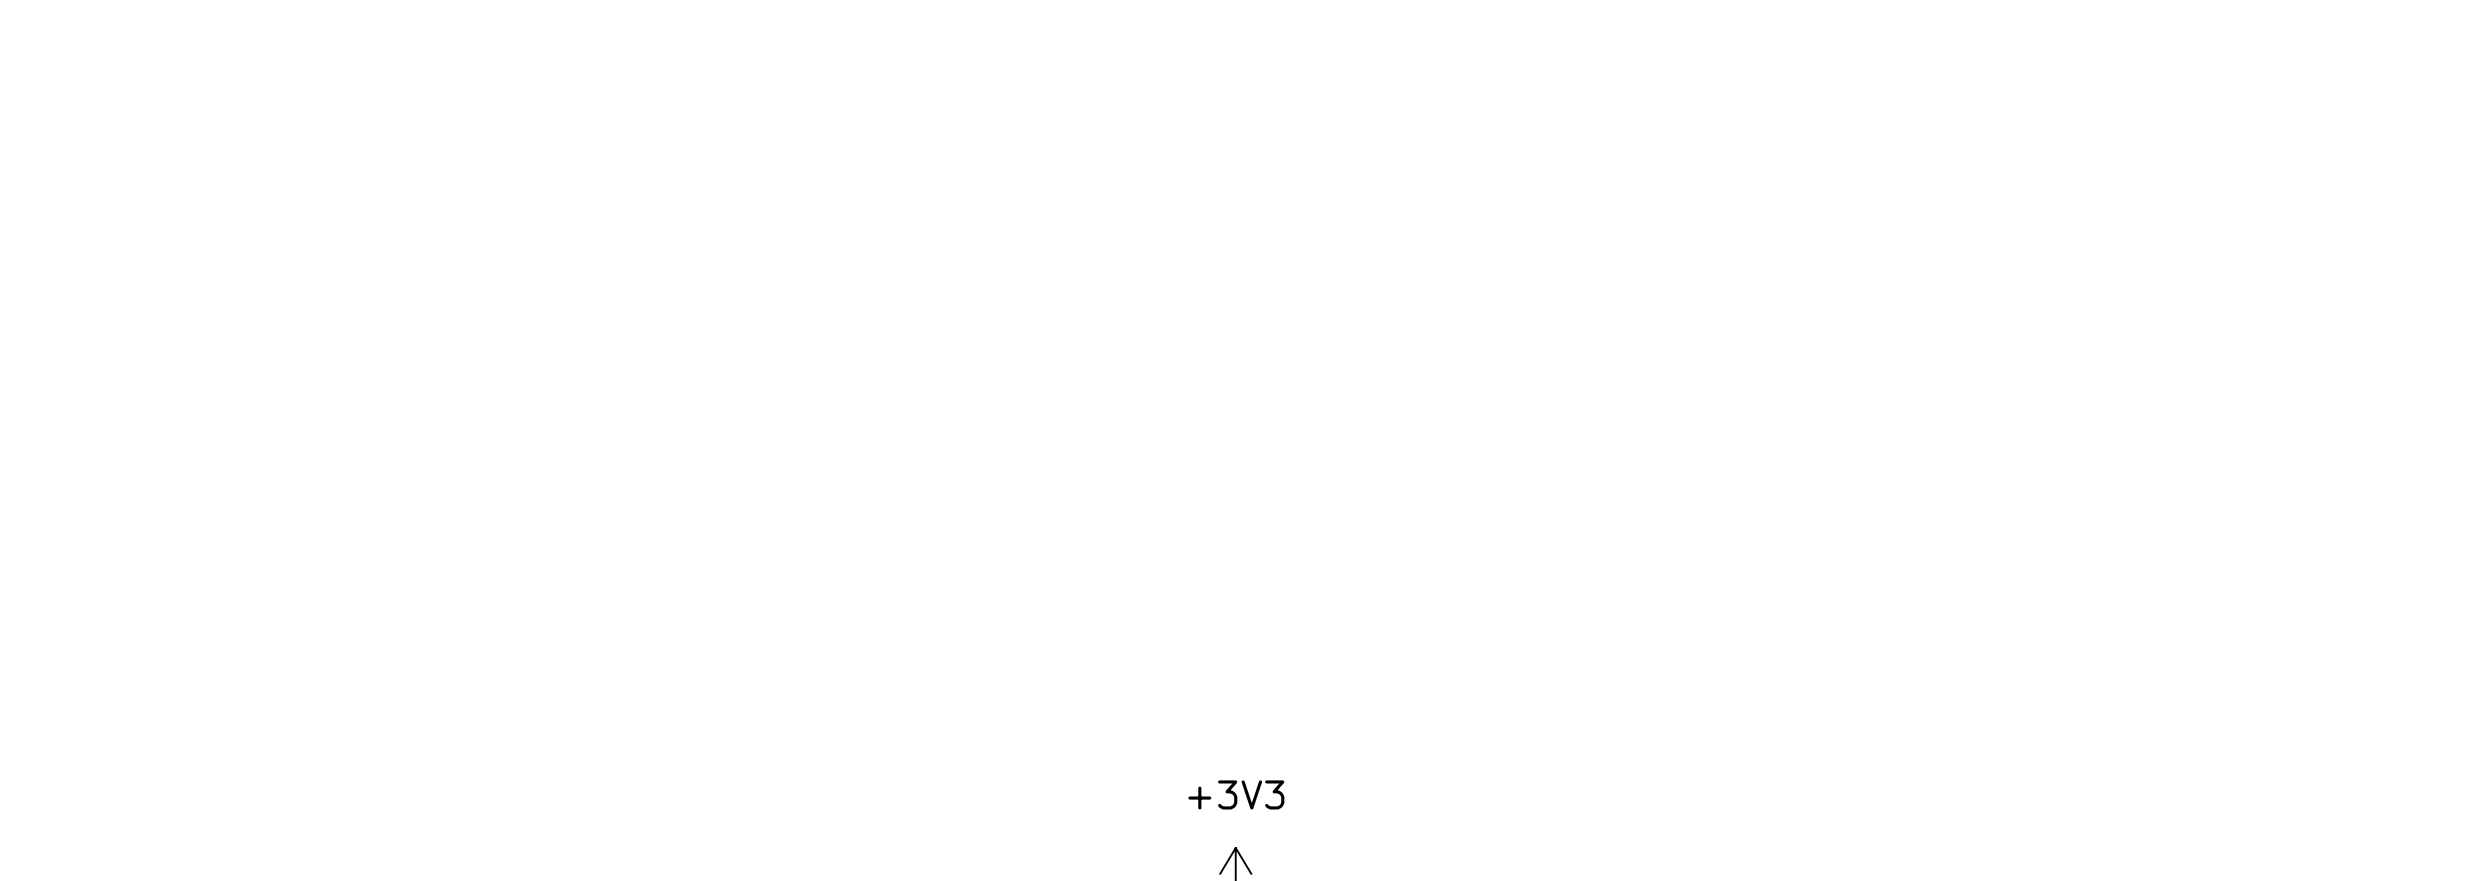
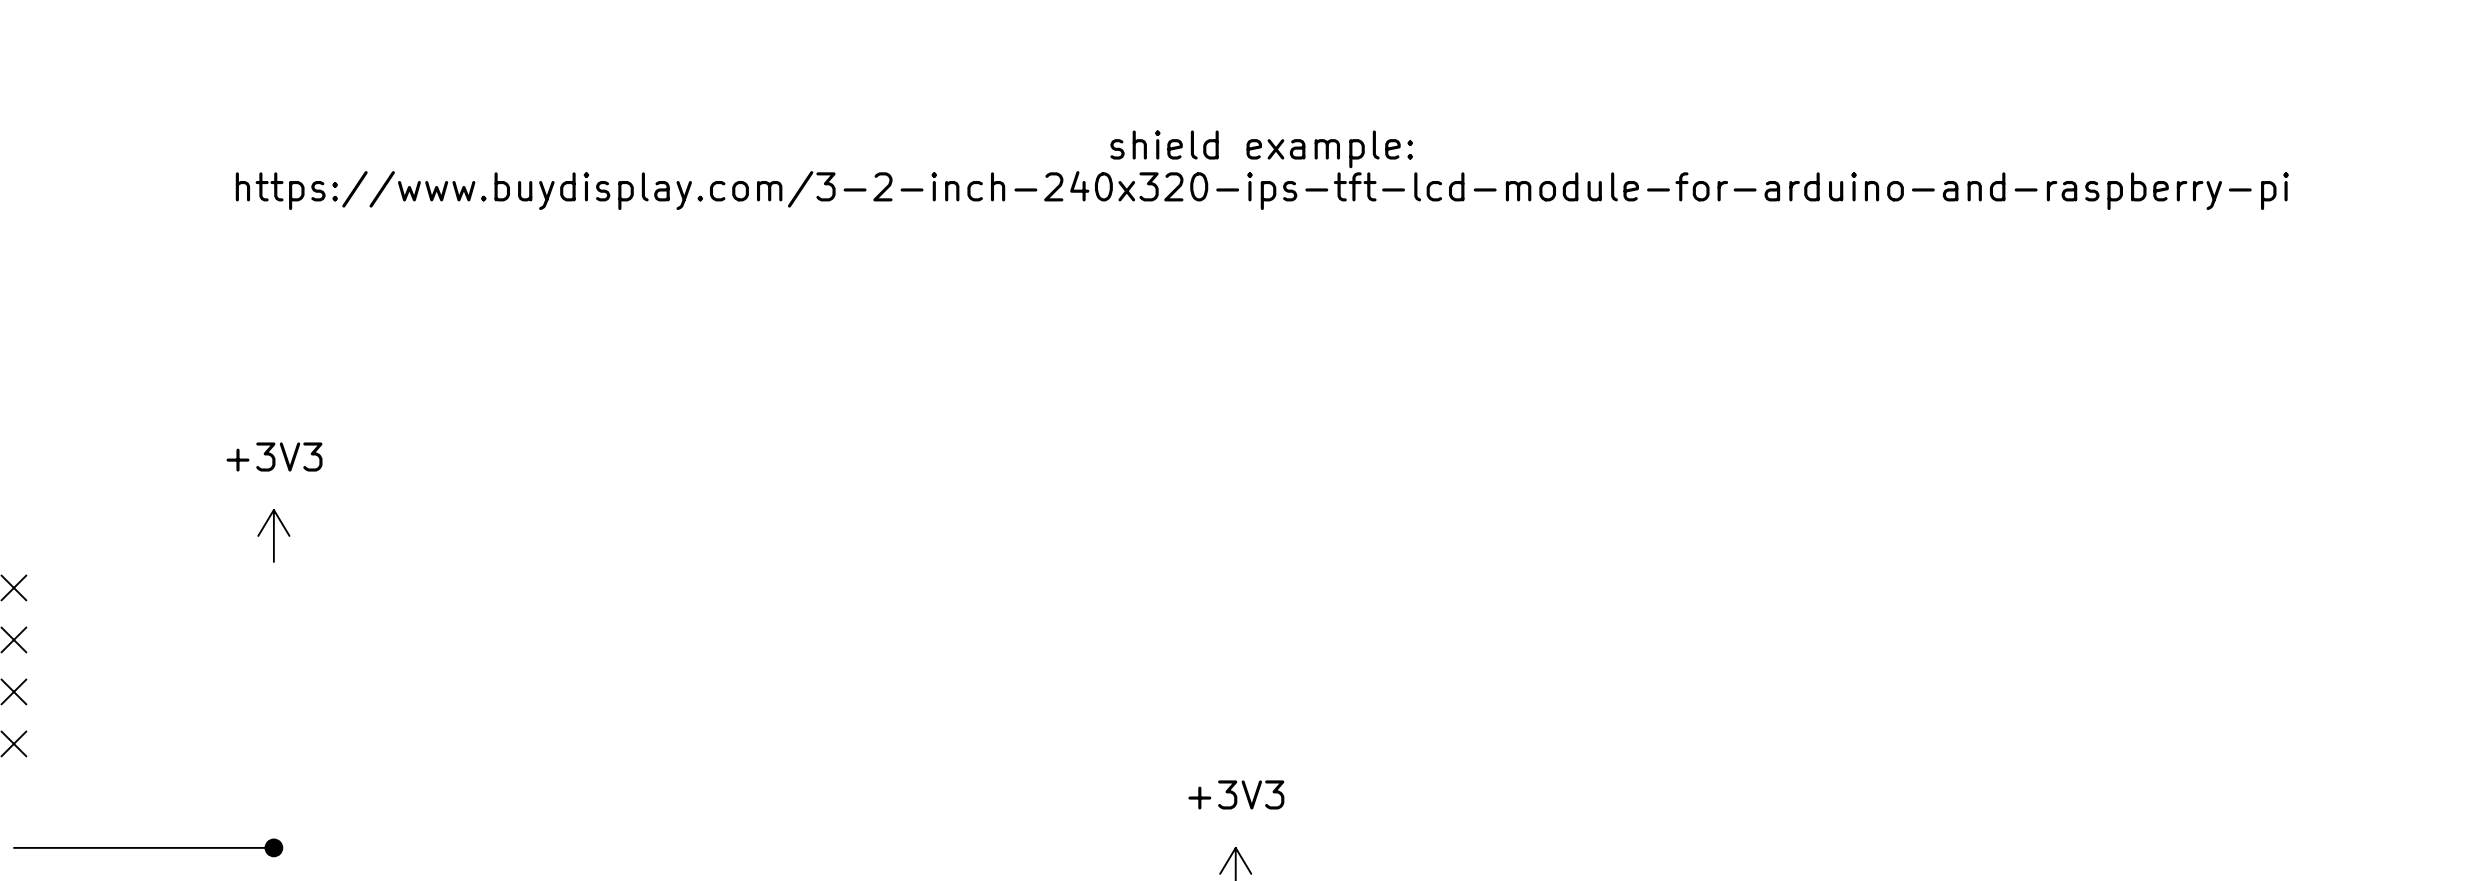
text: none -> shield example: (1261, 149)
text: none -> https://www.buydisplay.com/3-2-inch-240x320-ips-tft-lcd-module-for-arduino-and-raspberry-pi (1262, 190)
power symbol: none -> +3V3 (273, 535)
no-connect mark: none -> (13, 587)
no-connect mark: none -> (13, 639)
no-connect mark: none -> (13, 691)
no-connect mark: none -> (13, 743)
wire: none -> (13, 847) (273, 847)
junction: none -> (273, 847)

